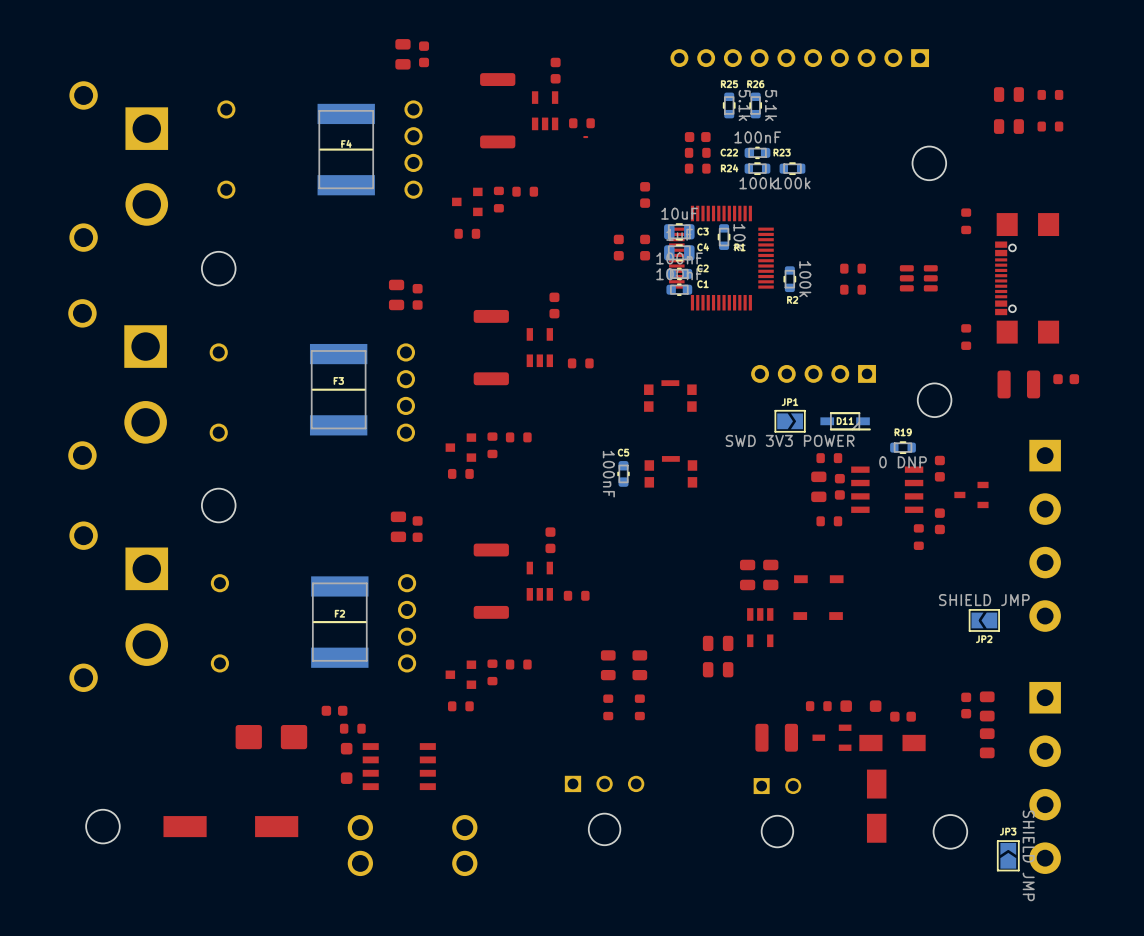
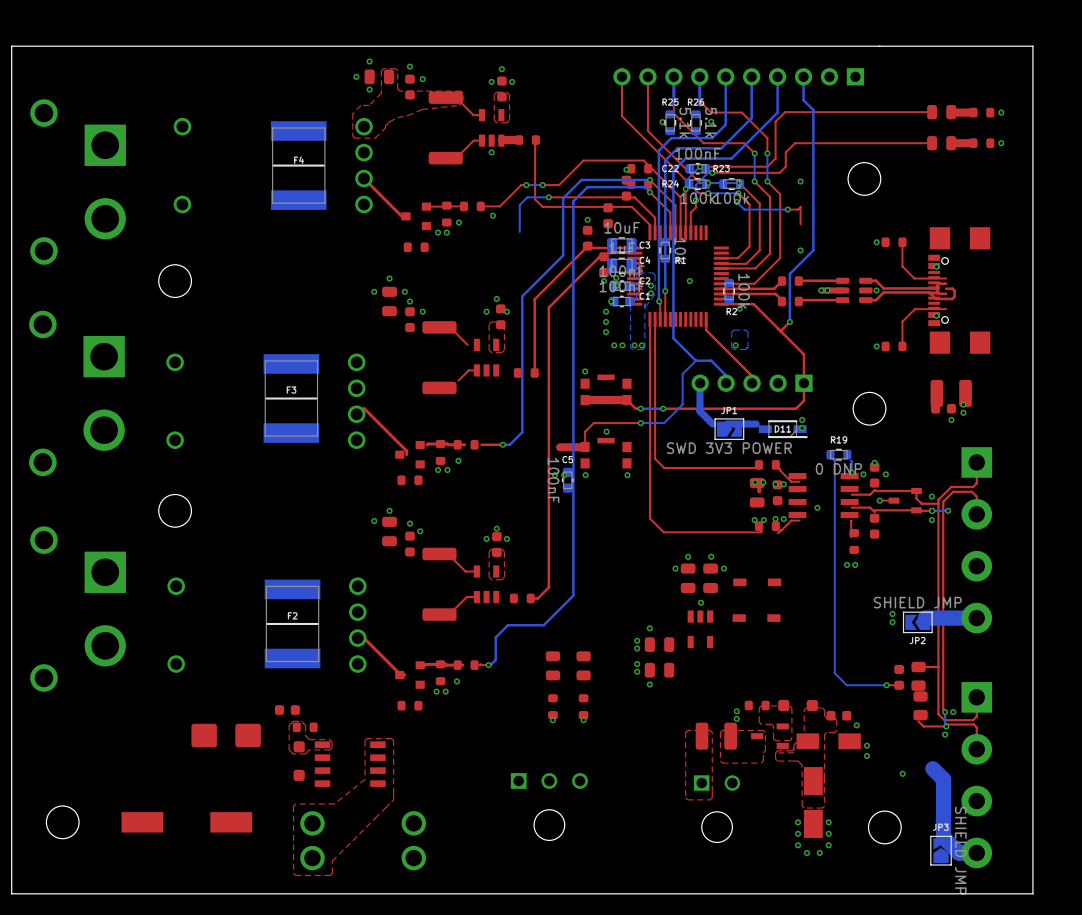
board edge: none -> (1032, 46) (11, 46) (11, 893) (1032, 893) (1032, 46)
part footprint: [419, 41, 430, 68] -> [364, 69, 395, 85]
via: none -> (369, 61)
via: none -> (409, 66)
top zone outline: none -> (395, 68) (397, 70) (397, 89) (399, 91) (461, 91) (463, 93) (463, 101) (458, 105) (422, 109) (397, 117) (389, 121) (375, 138) (354, 138) (352, 136) (352, 113) (360, 105) (369, 105) (381, 93) (381, 70) (383, 68) (395, 68)
via: none -> (501, 69)
part: (402, 54) -> none
via: none -> (356, 76)
top track: none -> (621, 76) (621, 116) (698, 193) (708, 193)
top track: none -> (647, 76) (647, 130) (700, 183) (708, 183)
top track: none -> (673, 76) (673, 113) (703, 143) (744, 143) (754, 153)
bottom track: none -> (673, 77) (673, 105)
top track: none -> (699, 76) (699, 101) (711, 112) (741, 112) (767, 138) (767, 153)
bottom track: none -> (699, 76) (699, 105)
bottom track: none -> (725, 76) (725, 124) (712, 138) (671, 138) (658, 150) (659, 301)
bottom track: none -> (751, 76) (751, 118) (721, 148) (677, 148) (665, 160) (665, 291)
bottom track: none -> (777, 76) (777, 112) (731, 158) (685, 158) (673, 170) (673, 338) (695, 360)
bottom track: none -> (803, 76) (803, 100) (813, 110) (813, 250) (789, 273) (789, 321)
via: none -> (422, 79)
via: none -> (491, 81)
via: none -> (512, 81)
part: none -> (409, 87)
via: none -> (369, 89)
top zone outline: none -> (506, 92) (496, 92) (494, 94) (494, 120) (496, 122) (506, 122) (509, 120) (509, 94) (506, 92)
top track: none -> (445, 97) (456, 97) (473, 115) (481, 115)
top track: none -> (932, 112) (785, 112) (775, 121) (775, 158) (767, 166) (700, 166)
top track: none -> (951, 112) (973, 112)
via: none -> (1001, 112)
via: none -> (662, 122)
via: none -> (711, 121)
top track: none -> (481, 140) (473, 140) (456, 158) (445, 158)
top track: none -> (518, 140) (501, 140)
top track: none -> (535, 140) (535, 199) (542, 206) (631, 206) (649, 224) (649, 232)
top track: none -> (932, 143) (794, 143) (785, 152) (785, 166) (779, 172) (712, 172)
top track: none -> (973, 143) (951, 143)
via: none -> (1001, 143)
via: none -> (491, 152)
top track: (587, 137) (584, 137) -> none
part: (697, 137) -> none
bottom track: none -> (754, 153) (754, 181)
via: none -> (754, 153)
bottom track: none -> (767, 153) (767, 181)
via: none -> (767, 153)
bottom track: none -> (700, 166) (685, 181) (685, 189)
via: none -> (700, 166)
via: none -> (626, 169)
bottom track: none -> (712, 172) (708, 172) (695, 185) (695, 200)
via: none -> (712, 172)
top track: none -> (364, 178) (401, 216)
top track: none -> (649, 179) (675, 205) (675, 232)
bottom track: none -> (649, 179) (581, 179) (563, 198) (563, 255) (522, 296) (522, 432) (509, 444) (502, 444)
via: none -> (649, 179)
top track: none -> (754, 181) (769, 196) (769, 253) (755, 268) (721, 268)
via: none -> (754, 181)
top track: none -> (767, 181) (780, 194) (780, 258) (754, 283) (721, 283)
via: none -> (767, 181)
via: none -> (800, 181)
via: none -> (708, 183)
top track: none -> (739, 183) (759, 203) (759, 250) (746, 263) (721, 263)
bottom track: none -> (739, 183) (708, 183)
via: none -> (739, 183)
top track: none -> (526, 185) (521, 185) (499, 206) (480, 206)
via: none -> (526, 185)
top track: none -> (542, 185) (559, 185) (583, 160) (643, 160) (680, 197) (680, 232)
bottom track: none -> (542, 185) (526, 185)
via: none -> (542, 185)
part: none -> (626, 188)
top track: none -> (685, 189) (685, 235)
via: none -> (685, 189)
top track: none -> (649, 192) (670, 212) (670, 227)
bottom track: none -> (649, 192) (644, 187) (587, 187) (573, 201) (573, 595) (543, 625) (508, 625) (495, 637) (495, 659) (488, 665)
via: none -> (649, 192)
via: none -> (708, 193)
top track: none -> (738, 193) (749, 204) (749, 246) (737, 258) (721, 258)
bottom track: none -> (738, 193) (708, 193)
via: none -> (738, 193)
top track: none -> (548, 197) (634, 197) (655, 217) (655, 232)
bottom track: none -> (548, 197) (527, 197) (519, 205) (519, 232)
via: none -> (548, 197)
top track: none -> (695, 200) (695, 207) (690, 212) (690, 232) (691, 225)
via: none -> (695, 200)
bottom track: none -> (736, 201) (744, 209) (787, 209)
via: none -> (736, 201)
top track: none -> (463, 206) (426, 206)
part: (645, 194) -> none
top track: none -> (787, 209) (798, 209) (800, 207) (800, 224)
via: none -> (787, 209)
via: none -> (492, 215)
part: none -> (608, 215)
via: none -> (587, 219)
via: none -> (458, 222)
via: none -> (438, 232)
via: none -> (446, 232)
part rotation: 0° (966, 221) -> 90° clockwise (894, 242)
part: none -> (587, 238)
via: none -> (876, 242)
top track: none -> (902, 242) (902, 266) (914, 278) (946, 278)
top track: none -> (634, 248) (585, 248) (534, 299) (534, 372)
via: none -> (800, 250)
top track: none -> (634, 253) (607, 253) (604, 256) (599, 256) (548, 307) (548, 587) (537, 598) (532, 598)
part: (618, 247) -> none
part: (645, 247) -> none
part: none -> (604, 264)
via: none -> (936, 266)
part position: (721, 258) -> (678, 276)
via: none -> (616, 278)
via: none -> (389, 278)
via: none -> (604, 281)
via: none -> (689, 281)
top track: none -> (781, 281) (774, 288) (721, 288)
top track: none -> (842, 280) (798, 281)
top track: none -> (865, 280) (875, 280) (883, 288) (937, 288)
top track: none -> (946, 283) (937, 285) (939, 293) (946, 293)
via: none -> (616, 285)
via: none -> (650, 285)
top track: none -> (946, 288) (952, 288) (954, 290) (954, 296) (952, 298) (935, 298) (929, 292) (883, 292) (875, 300) (865, 300)
via: none -> (821, 290)
via: none -> (827, 290)
top track: none -> (842, 290) (821, 290)
via: none -> (876, 290)
via: none -> (374, 291)
via: none -> (404, 291)
top track: none -> (665, 291) (665, 319)
via: none -> (665, 291)
via: none -> (650, 293)
top track: none -> (721, 293) (775, 293) (781, 300)
via: none -> (496, 298)
top track: none -> (842, 300) (798, 301)
via: none -> (409, 301)
via: none -> (611, 301)
top track: none -> (659, 301) (660, 319)
via: none -> (659, 301)
bottom zone outline: none -> (644, 303) (644, 347) (642, 349) (632, 349) (630, 347) (630, 305) (636, 298) (636, 274) (638, 272) (653, 272) (655, 274) (655, 294) (644, 307)
top track: none -> (721, 304) (753, 304) (803, 354) (803, 400) (796, 408) (663, 408)
part position: (396, 294) -> (389, 301)
part position: (417, 296) -> (409, 319)
via: none -> (739, 308)
top track: none -> (946, 309) (914, 309) (902, 321) (902, 346)
via: none -> (422, 311)
via: none -> (486, 311)
via: none -> (506, 311)
via: none -> (606, 311)
via: none -> (936, 315)
top track: none -> (649, 319) (649, 518) (663, 532) (762, 531)
top track: none -> (655, 319) (655, 458) (664, 467) (762, 467)
top track: none -> (706, 319) (706, 330) (752, 376) (752, 390)
top zone outline: none -> (501, 321) (491, 321) (489, 324) (489, 350) (491, 352) (501, 352) (504, 350) (504, 324) (501, 321)
via: none -> (606, 321)
top track: none -> (789, 321) (780, 331)
via: none -> (789, 321)
top track: none -> (450, 327) (467, 344)
via: none -> (606, 332)
via: none -> (614, 345)
via: none -> (622, 345)
via: none -> (634, 345)
via: none -> (641, 345)
via: none -> (735, 345)
via: none -> (876, 346)
bottom zone outline: none -> (748, 347) (748, 332) (745, 330) (733, 330) (731, 332) (731, 347) (733, 349) (745, 349) (748, 347)
part rotation: 0° (966, 337) -> 90° clockwise (894, 346)
bottom track: none -> (695, 360) (682, 374) (682, 404) (664, 423) (640, 423)
bottom track: none -> (695, 360) (711, 360) (726, 375) (725, 390)
top track: none -> (476, 370) (468, 370) (458, 380)
via: none -> (585, 371)
part position: (1066, 379) -> (943, 408)
bottom track: none -> (700, 390) (700, 411) (712, 424)
top track: none -> (585, 400) (626, 400) (635, 408) (640, 408)
part position: (670, 396) -> (606, 389)
via: none -> (963, 404)
top track: none -> (364, 408) (406, 450) (406, 454)
via: none -> (640, 408)
bottom track: none -> (663, 408) (640, 408)
via: none -> (663, 408)
via: none -> (963, 412)
via: none -> (802, 419)
via: none -> (951, 419)
top track: none -> (640, 423) (593, 423) (585, 431) (584, 447) (560, 447)
via: none -> (640, 423)
bottom track: none -> (756, 424) (727, 424)
via: none -> (802, 428)
via: none -> (606, 431)
top track: none -> (464, 444) (427, 444)
top track: none -> (502, 444) (481, 444)
via: none -> (502, 444)
part: none -> (606, 453)
bottom track: none -> (832, 458) (834, 461) (834, 673) (846, 685) (886, 685)
via: none -> (458, 460)
bottom track: none -> (851, 460) (851, 472)
top track: none -> (976, 462) (976, 483) (973, 487) (951, 487) (938, 499) (938, 714) (944, 720) (973, 720) (976, 716) (976, 697)
via: none -> (874, 462)
top track: none -> (778, 467) (791, 481) (799, 481)
via: none -> (438, 470)
via: none -> (447, 470)
via: none -> (851, 472)
via: none -> (863, 474)
via: none -> (885, 474)
via: none -> (554, 475)
via: none -> (564, 475)
via: none -> (585, 475)
via: none -> (627, 475)
part: (670, 471) -> none
via: none -> (755, 482)
via: none -> (763, 482)
via: none -> (775, 484)
via: none -> (783, 484)
top track: none -> (759, 488) (759, 491)
top track: none -> (851, 494) (870, 494) (874, 490) (916, 490) (916, 498) (921, 503) (938, 503)
via: none -> (931, 496)
via: none -> (879, 500)
top track: none -> (894, 500) (879, 500)
via: none -> (817, 507)
top track: none -> (851, 507) (870, 507) (874, 512)
top track: none -> (972, 510) (976, 514) (976, 496) (972, 491) (953, 491) (943, 501) (943, 710) (945, 712)
via: none -> (389, 510)
top track: none -> (932, 510) (874, 510)
via: none -> (932, 510)
bottom track: none -> (948, 510) (932, 510)
via: none -> (948, 510)
via: none -> (775, 519)
via: none -> (783, 519)
via: none -> (754, 520)
via: none -> (763, 520)
via: none -> (931, 520)
top track: none -> (799, 520) (791, 520) (777, 533)
top track: none -> (851, 520) (851, 537)
via: none -> (374, 521)
via: none -> (409, 523)
via: none -> (496, 528)
part position: (398, 526) -> (389, 531)
via: none -> (420, 531)
part position: (417, 529) -> (409, 544)
via: none -> (486, 538)
via: none -> (506, 538)
top zone outline: none -> (501, 549) (491, 549) (489, 551) (489, 577) (491, 579) (501, 579) (504, 577) (504, 551) (501, 549)
top track: none -> (439, 554) (448, 554) (465, 571) (476, 571)
via: none -> (688, 556)
via: none -> (711, 556)
via: none -> (847, 564)
via: none -> (855, 564)
via: none -> (675, 568)
via: none -> (724, 568)
top track: none -> (476, 597) (466, 597) (449, 614) (439, 614)
via: none -> (701, 602)
via: none -> (892, 614)
bottom track: none -> (976, 618) (925, 618)
via: none -> (892, 622)
via: none -> (649, 628)
top track: none -> (364, 638) (400, 675) (404, 675)
via: none -> (637, 640)
via: none -> (637, 648)
top track: none -> (480, 664) (479, 665) (488, 665)
via: none -> (637, 664)
top track: none -> (462, 665) (425, 665)
via: none -> (488, 665)
top track: none -> (938, 666) (918, 666)
via: none -> (637, 671)
via: none -> (456, 681)
via: none -> (649, 684)
via: none -> (886, 685)
top track: none -> (899, 685) (886, 685)
via: none -> (436, 691)
via: none -> (445, 691)
part position: (966, 705) -> (899, 677)
top zone outline: none -> (789, 705) (761, 705) (759, 707) (759, 722) (773, 726) (773, 738) (775, 740) (789, 740) (791, 738) (791, 707) (789, 705)
via: none -> (736, 711)
bottom track: none -> (945, 712) (946, 726)
via: none -> (945, 712)
via: none -> (953, 712)
via: none -> (736, 718)
via: none -> (552, 720)
via: none -> (583, 720)
top zone outline: none -> (301, 721) (293, 721) (289, 725) (289, 749) (293, 753) (305, 753) (309, 749) (330, 749) (332, 747) (330, 739) (309, 739) (305, 735) (305, 725) (301, 721)
top track: none -> (918, 721) (923, 726) (973, 724) (976, 727) (976, 749)
via: none -> (856, 725)
via: none -> (946, 726)
top zone outline: none -> (710, 730) (687, 730) (685, 732) (685, 797) (687, 799) (710, 799) (712, 797) (712, 732) (710, 730)
top zone outline: none -> (763, 730) (765, 732) (765, 750) (761, 763) (722, 763) (720, 761) (720, 732) (722, 730) (763, 730)
via: none -> (945, 734)
top zone outline: none -> (391, 738) (393, 740) (393, 799) (332, 861) (332, 873) (330, 875) (295, 875) (293, 873) (293, 806) (295, 803) (334, 803) (365, 779) (365, 740) (367, 738) (391, 738)
part position: (987, 743) -> (918, 676)
via: none -> (866, 745)
top zone outline: none -> (793, 748) (791, 750) (777, 750) (775, 752)
top zone outline: none -> (775, 752) (777, 761) (798, 761) (802, 765) (802, 806) (804, 808) (822, 808) (824, 806) (824, 734) (836, 730) (836, 720) (834, 718) (826, 718) (822, 707) (806, 707) (804, 710) (804, 740) (793, 744) (793, 752) (775, 752)
via: none -> (866, 755)
bottom track: none -> (932, 768) (943, 779) (943, 837) (958, 852) (976, 852)
via: none -> (902, 773)
via: none -> (798, 822)
via: none -> (828, 822)
via: none -> (798, 833)
via: none -> (828, 833)
via: none -> (798, 845)
via: none -> (828, 845)
via: none -> (806, 852)
via: none -> (819, 852)

